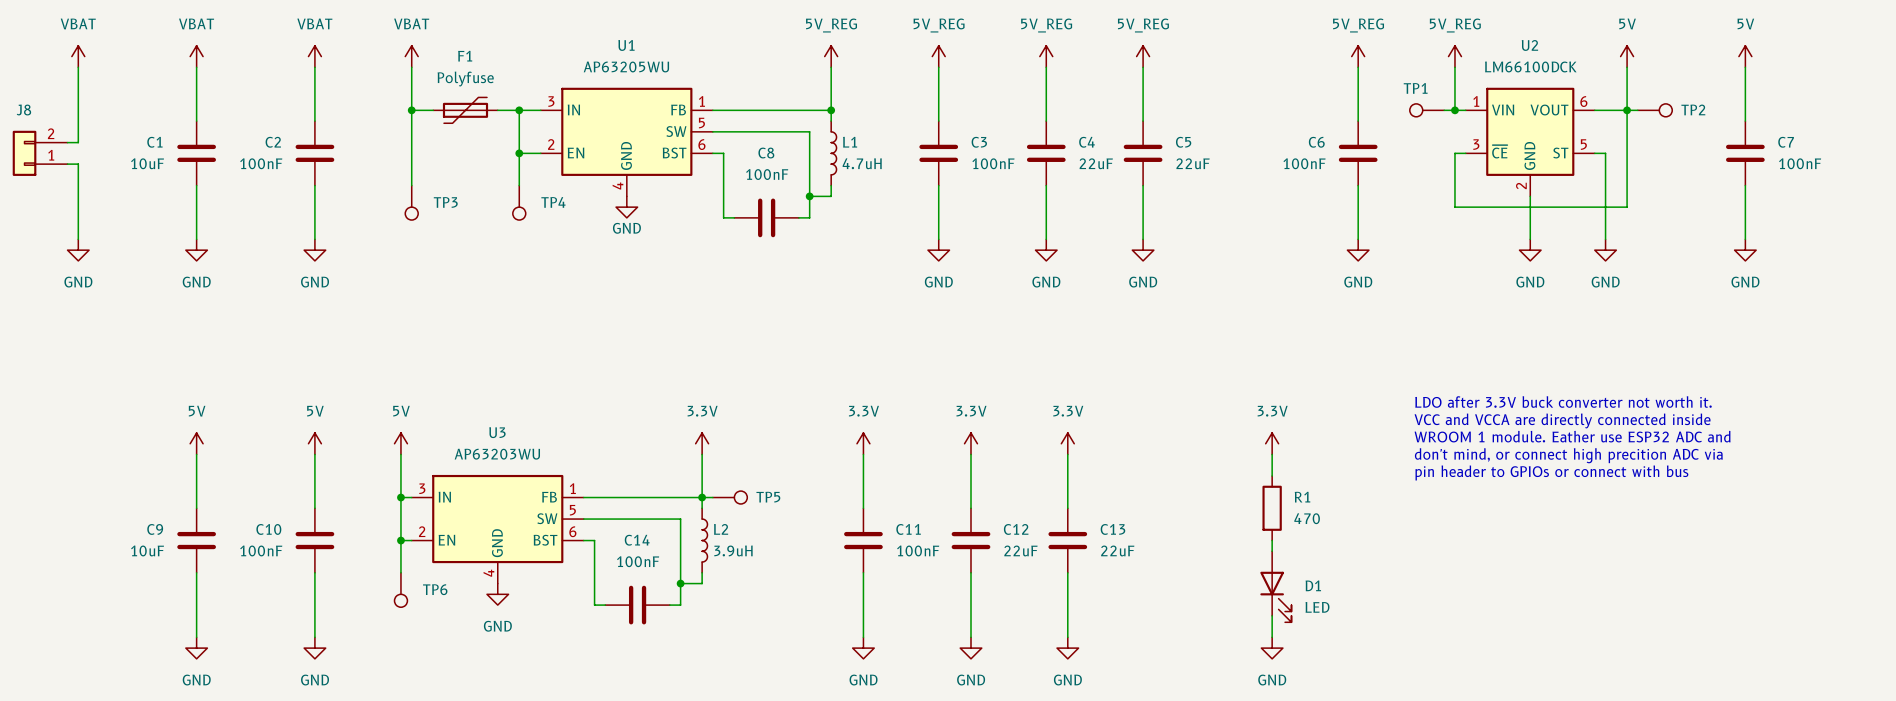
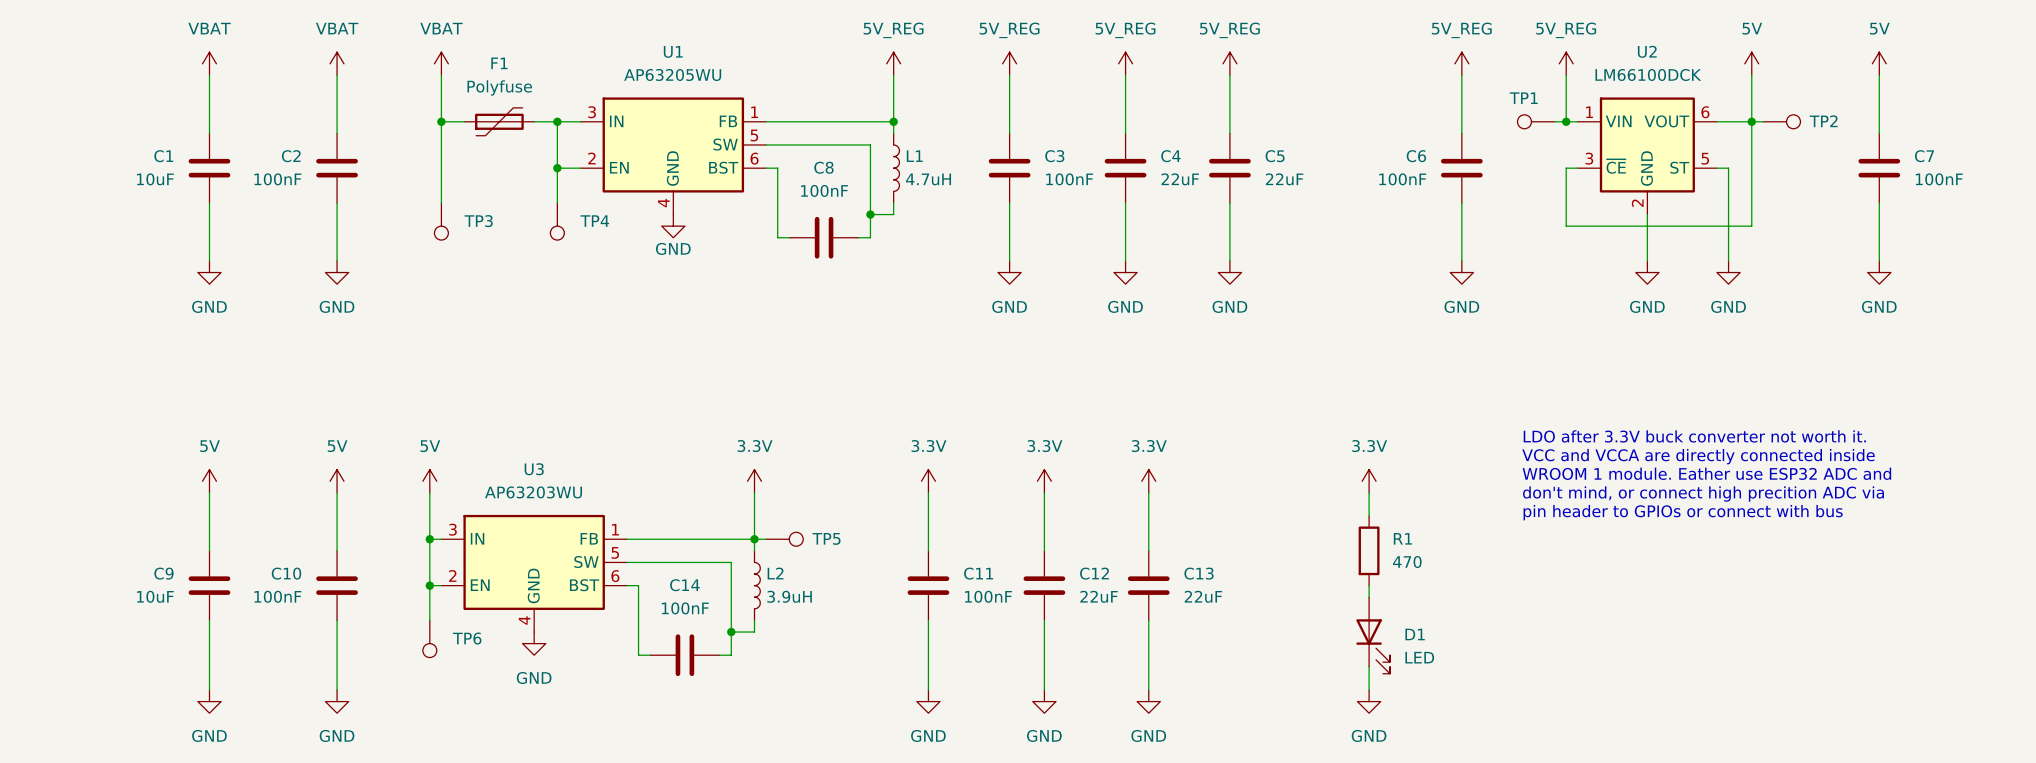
power symbol: VBAT (78, 56) -> none
wire: (78, 67) (78, 142) (67, 142) -> none
J8: (40, 153) -> none
wire: (67, 164) (78, 164) (78, 239) -> none
power symbol: GND (78, 250) -> none

